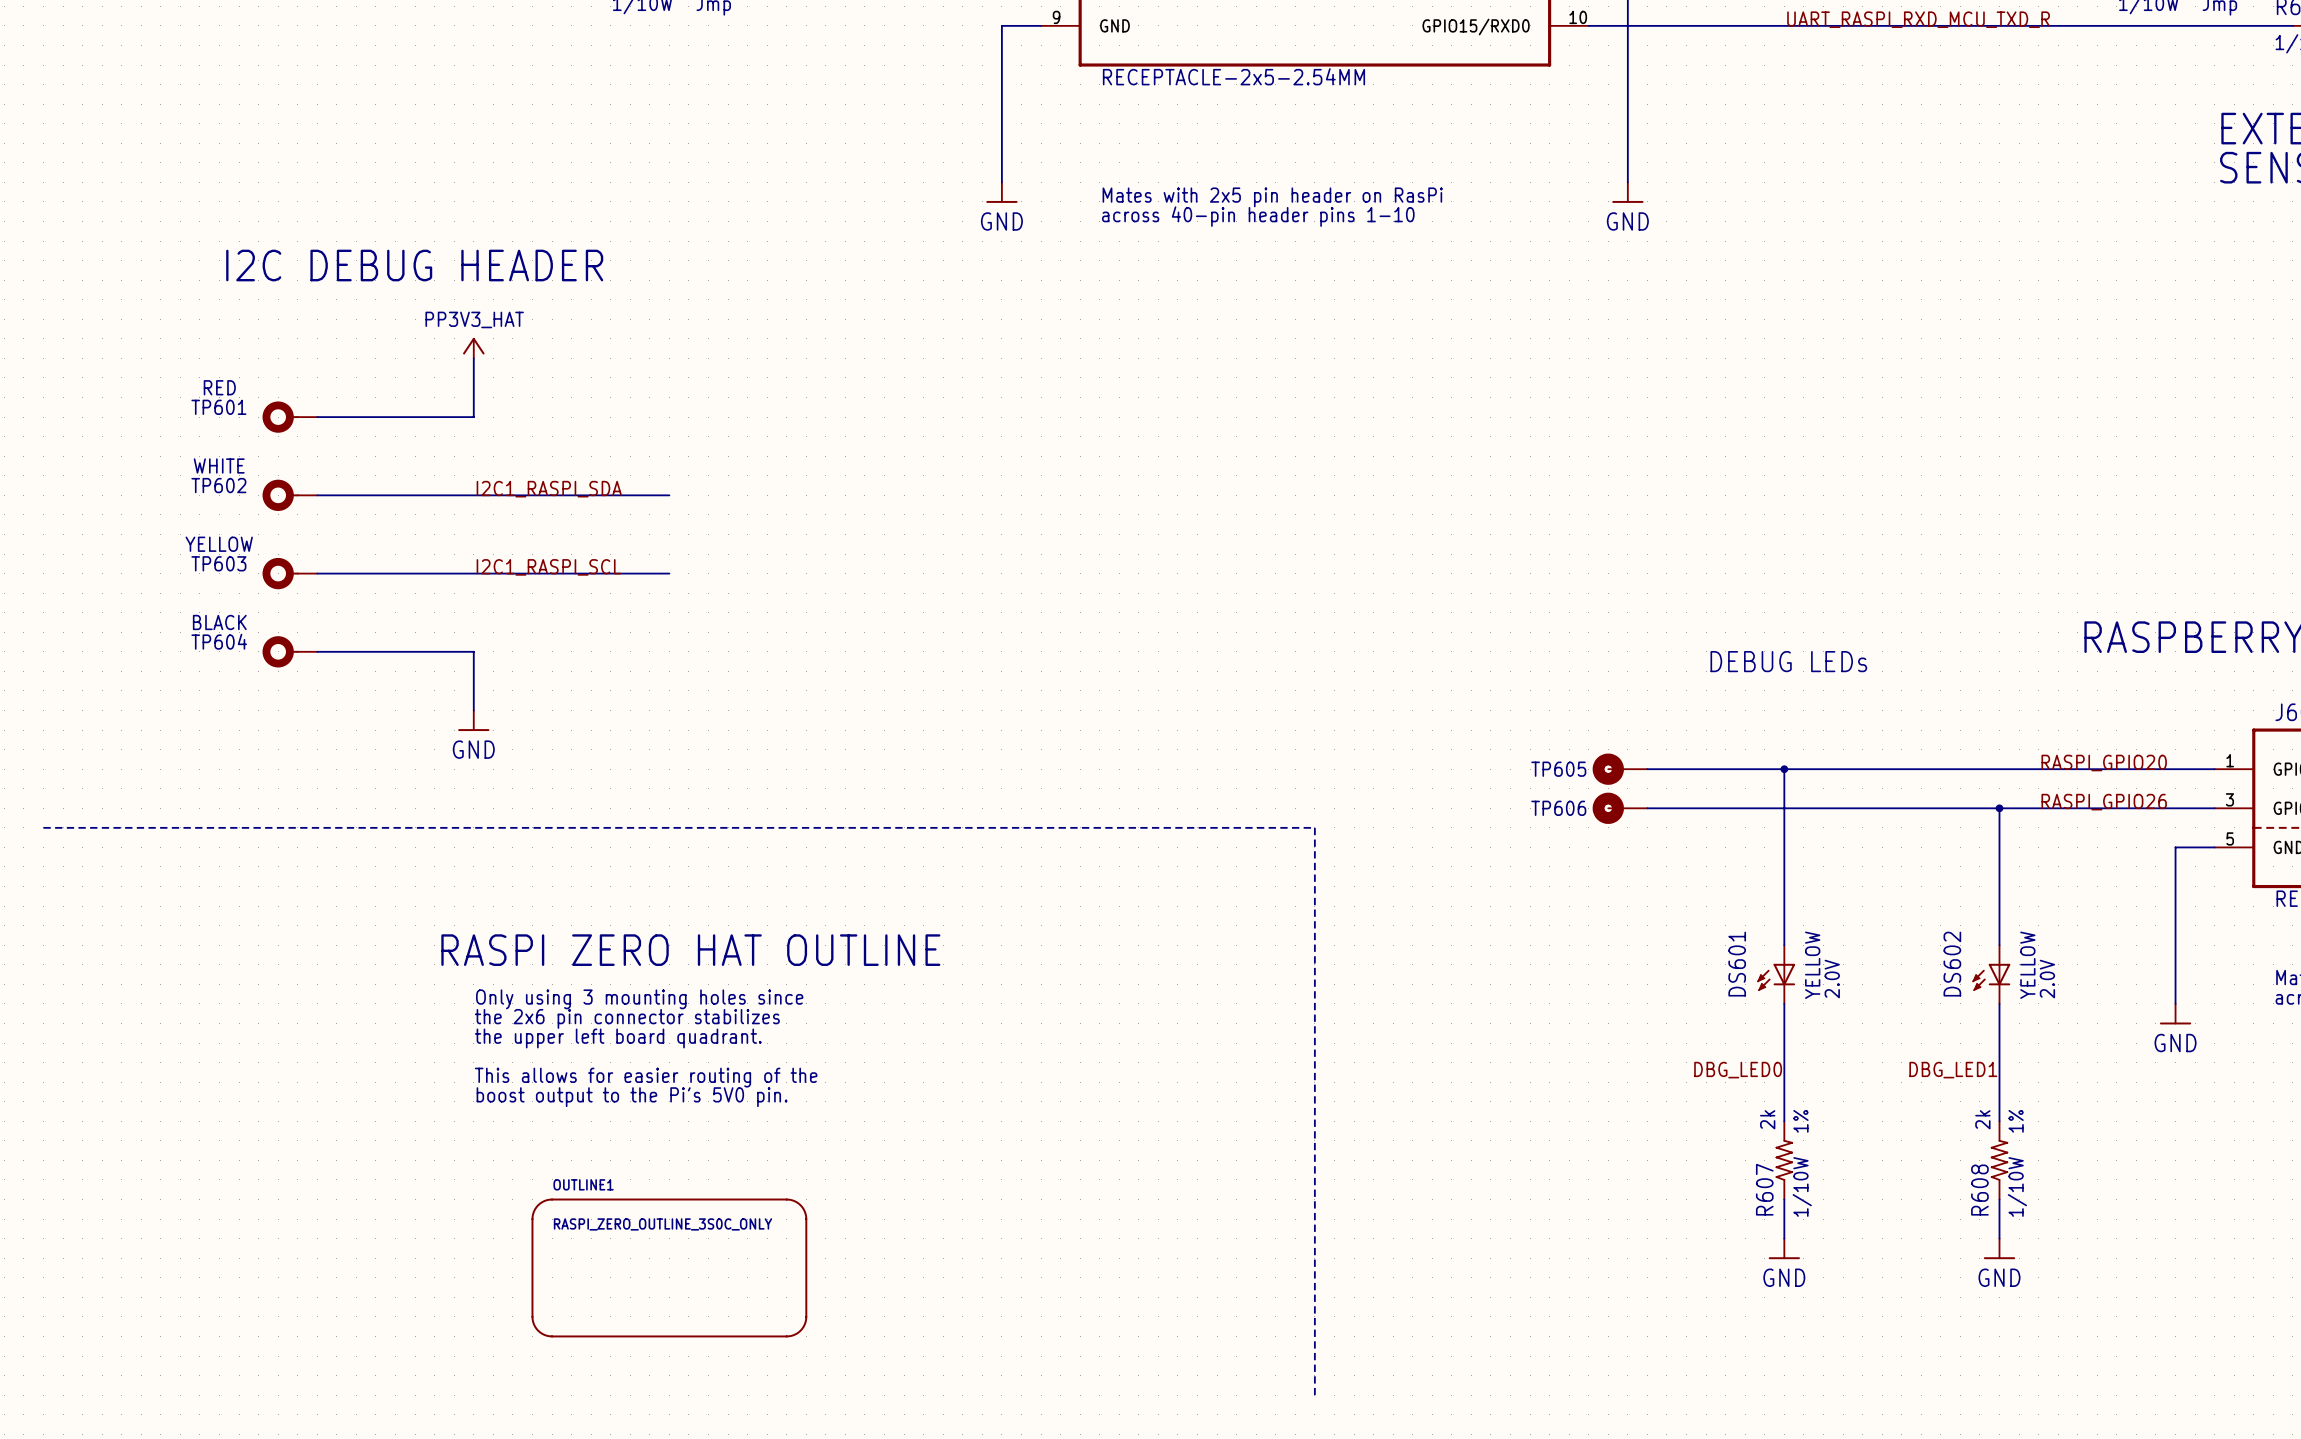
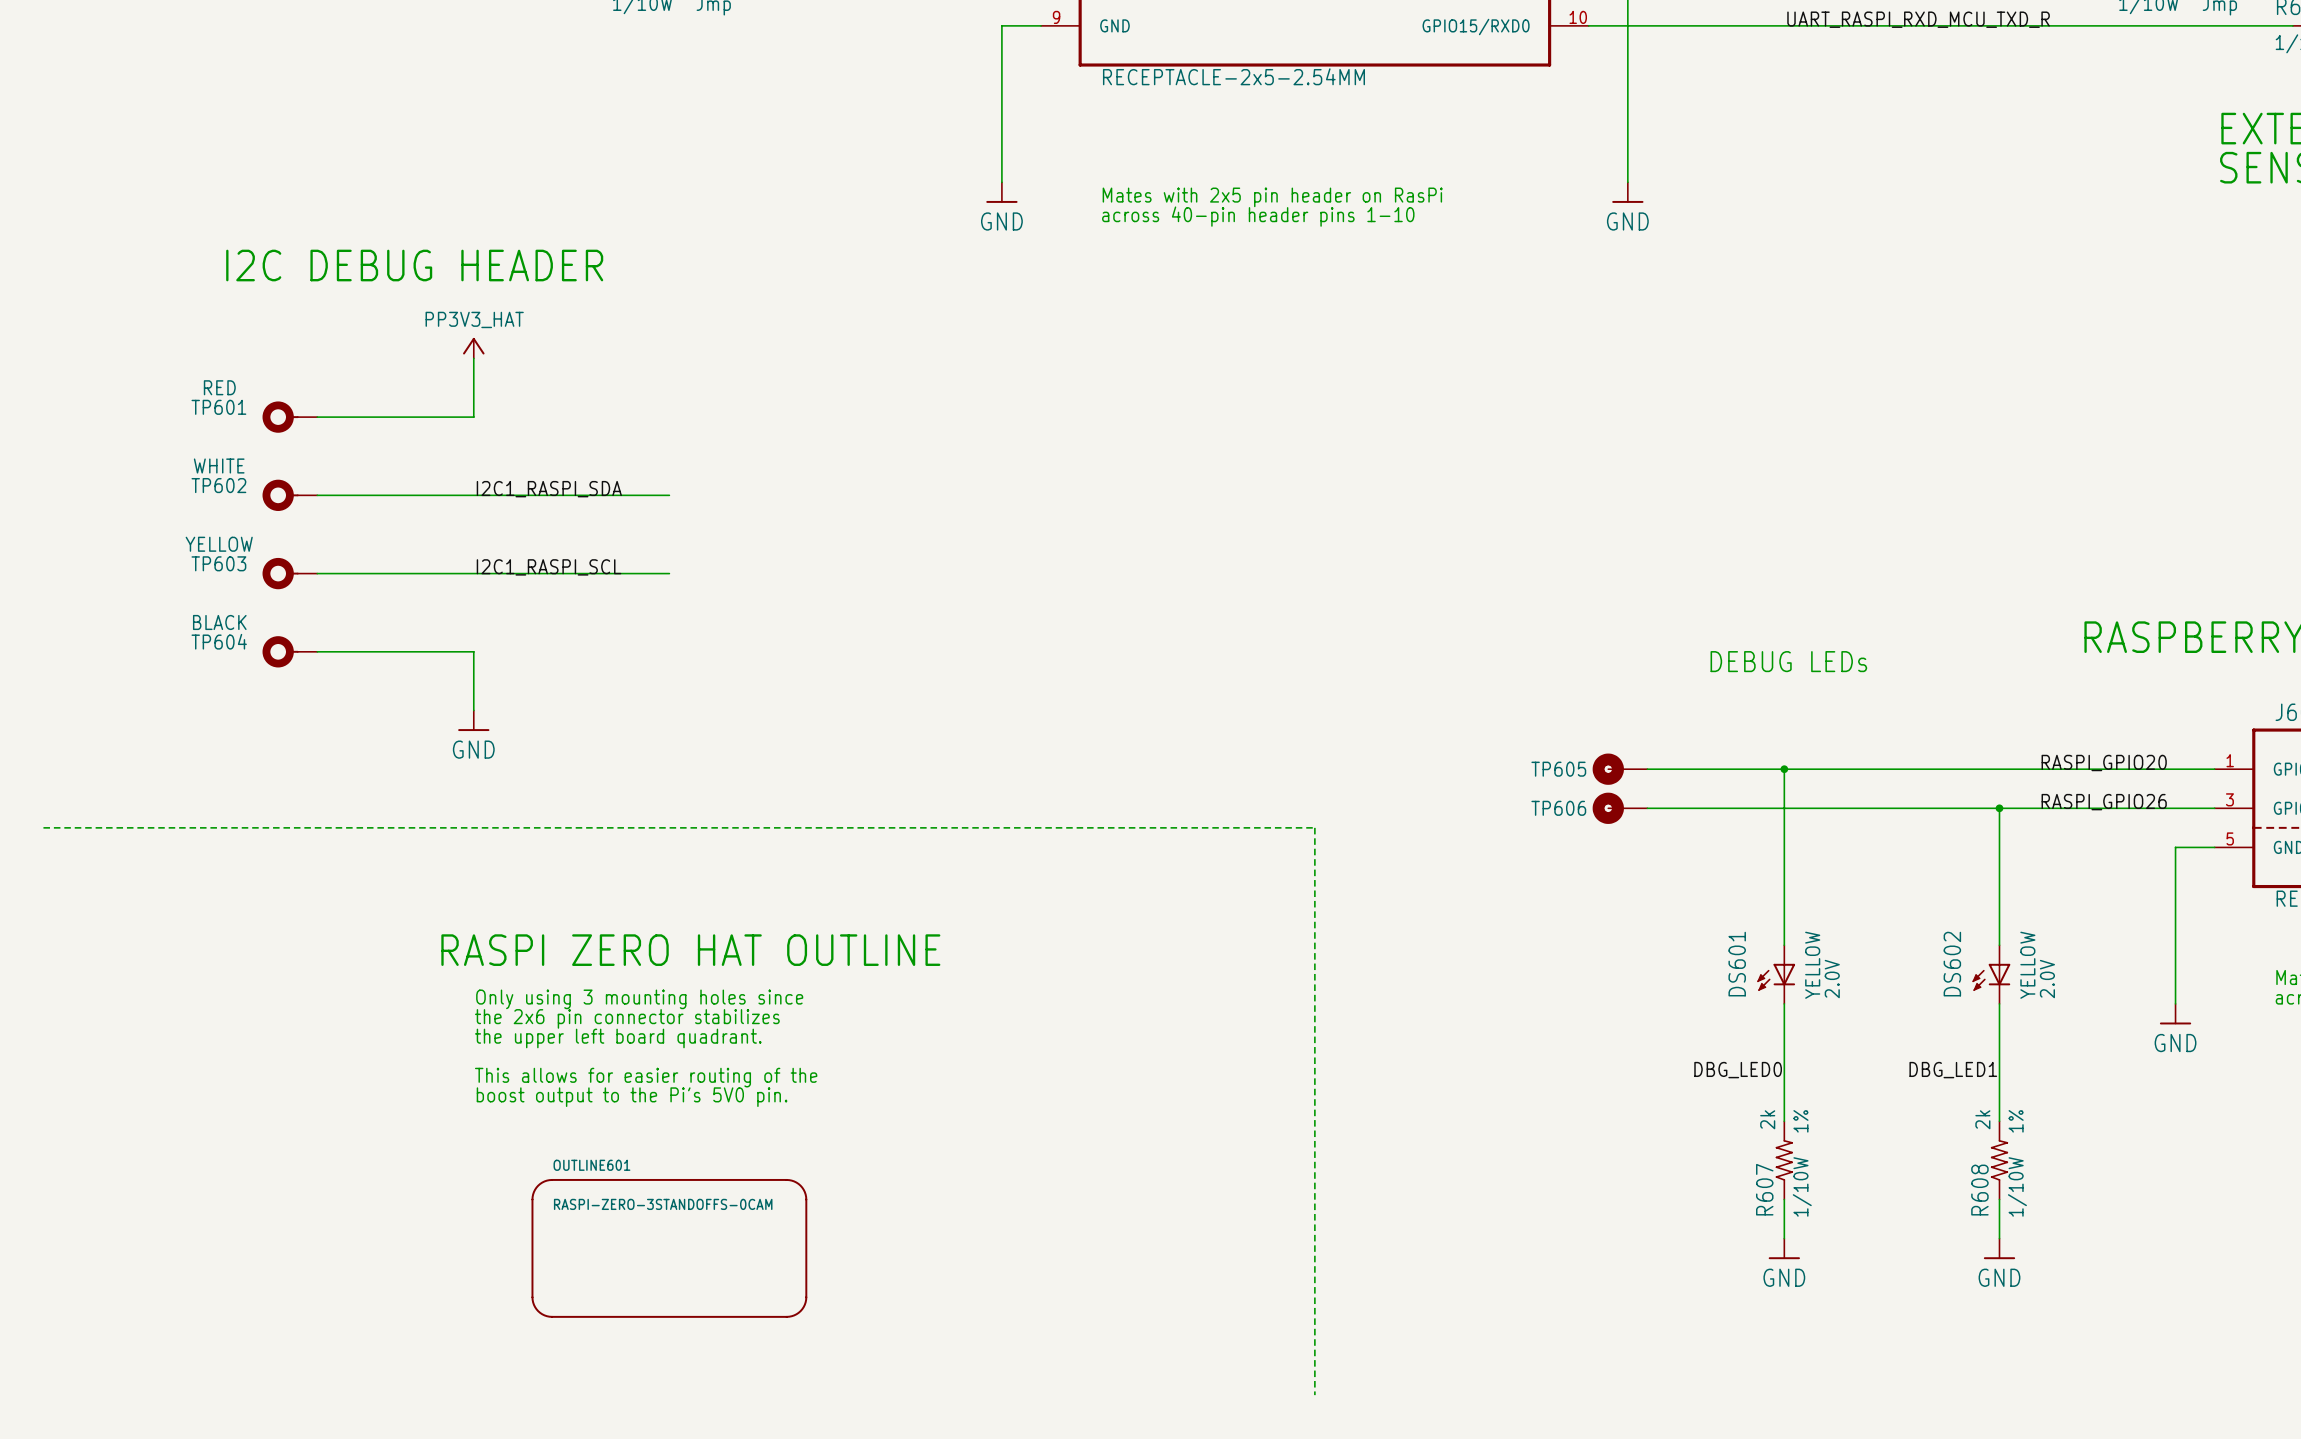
OUTLINE601: none -> RASPI-ZERO-3STANDOFFS-0CAM (669, 1248)
OUTLINE1: RASPI_ZERO_OUTLINE_3S0C_ONLY (669, 1267) -> none

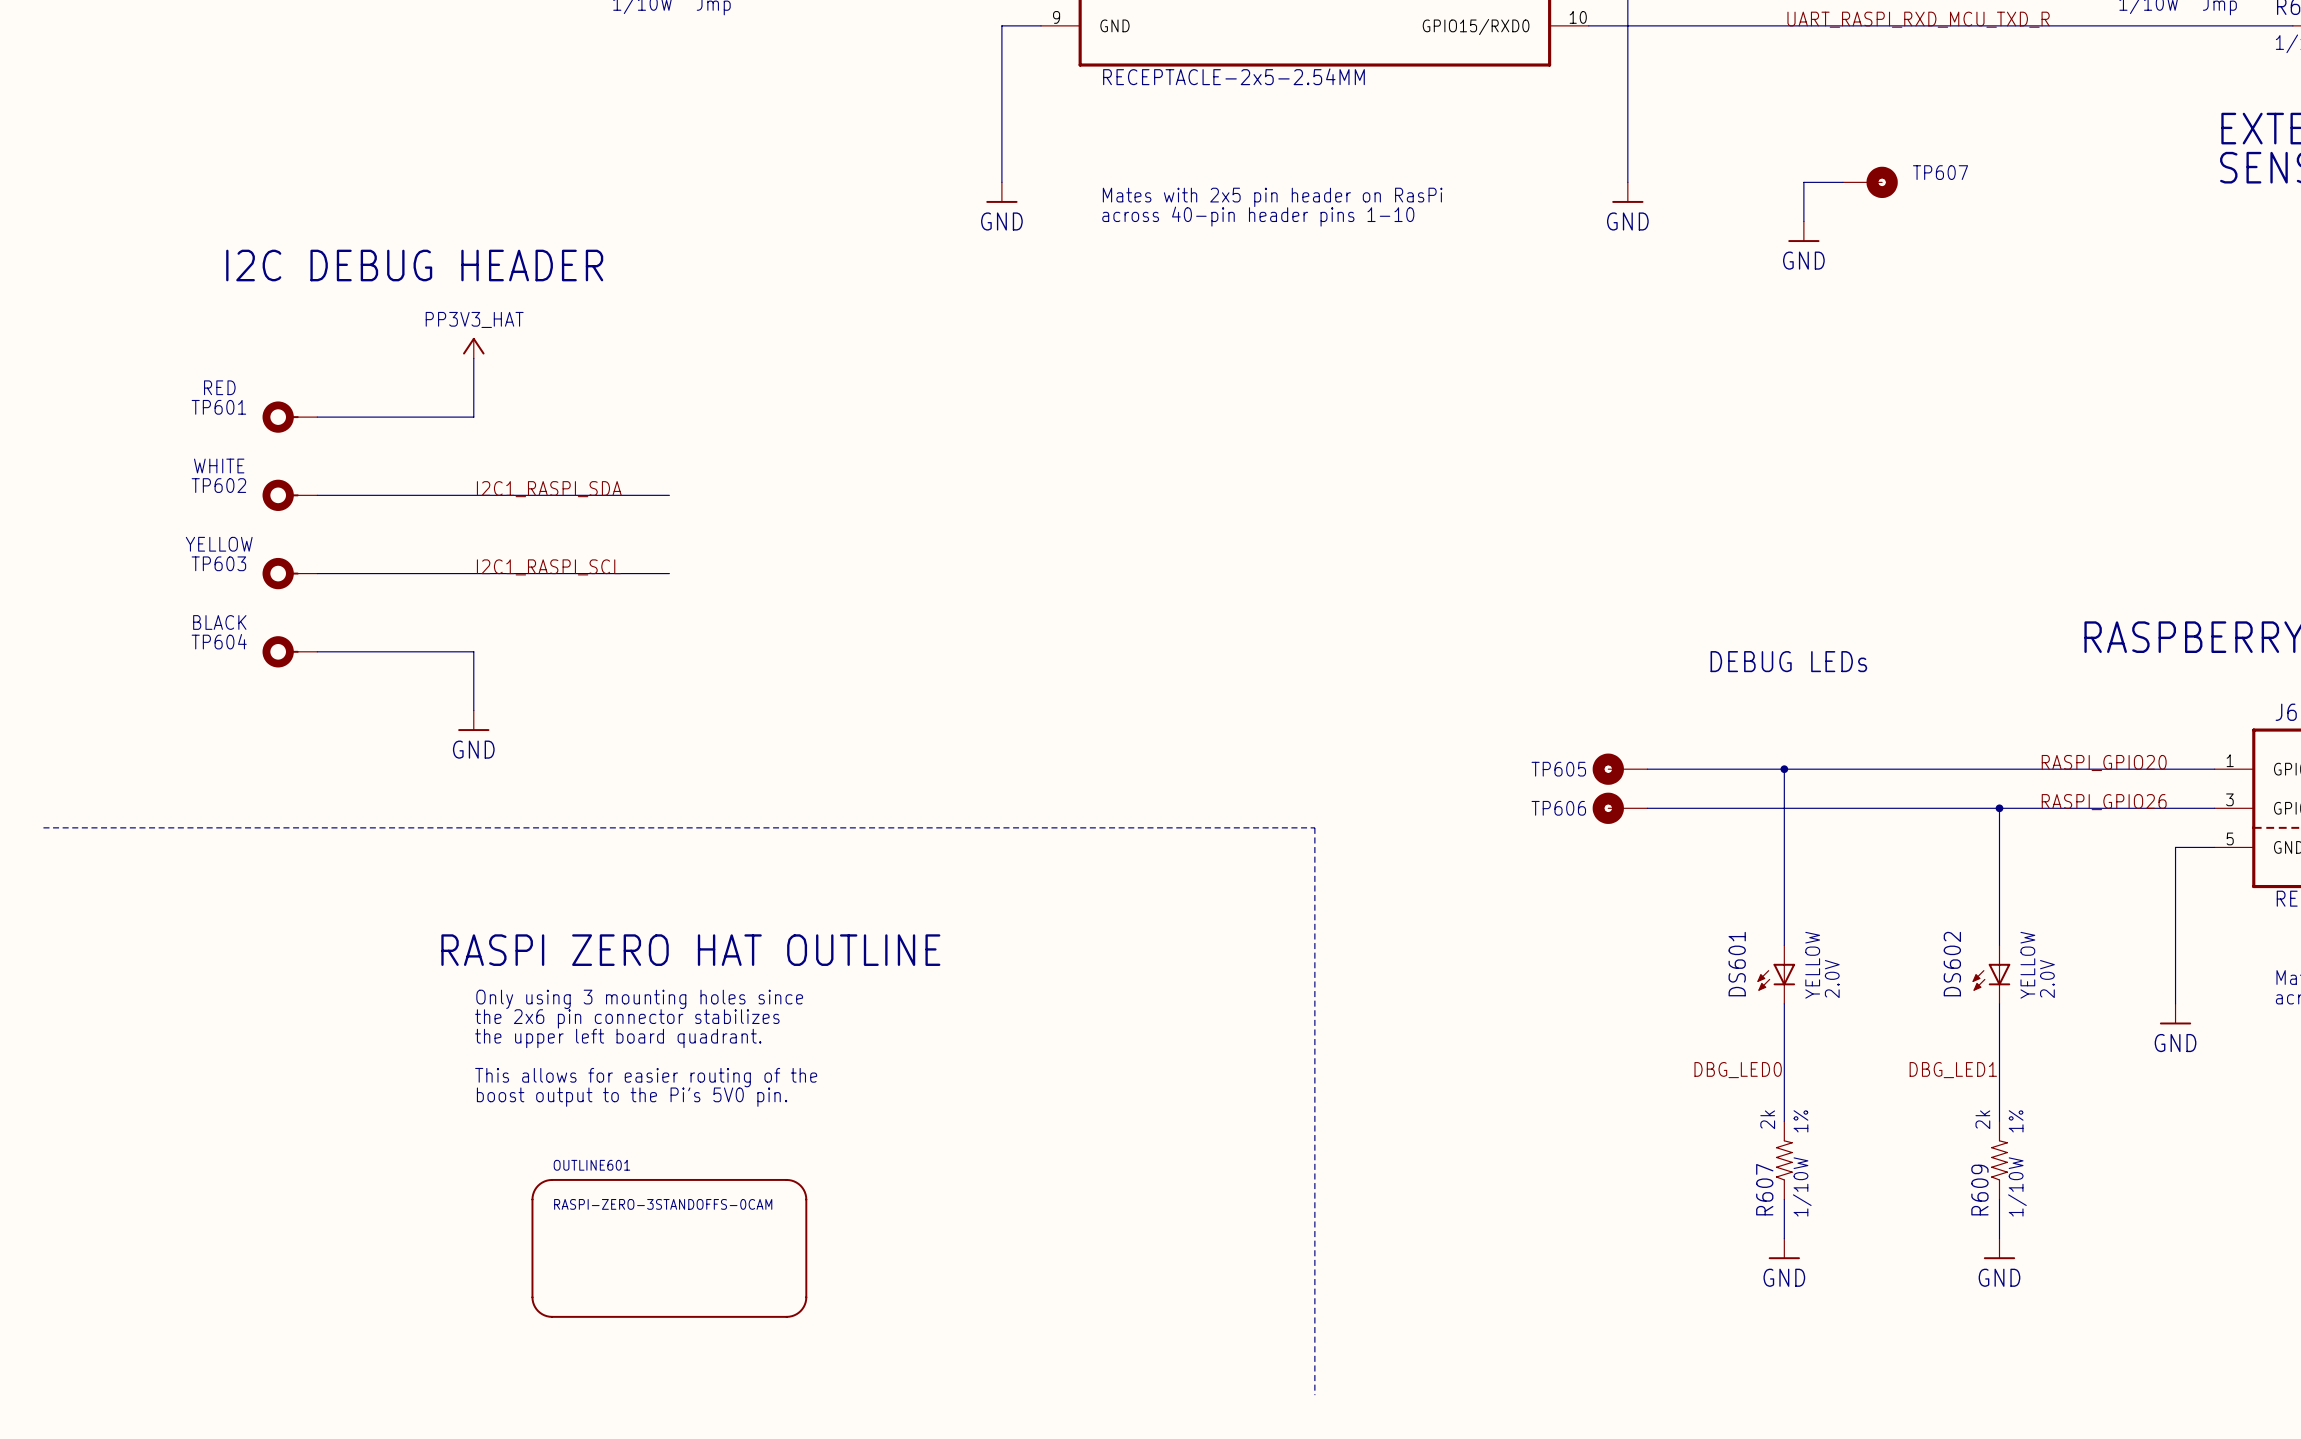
wire: none -> (1843, 182) (1803, 182) (1803, 221)
TP607: none -> (1870, 182)
power symbol: none -> GND (1803, 231)
R608 name: R608 (1979, 1190) -> R609 (1979, 1190)

